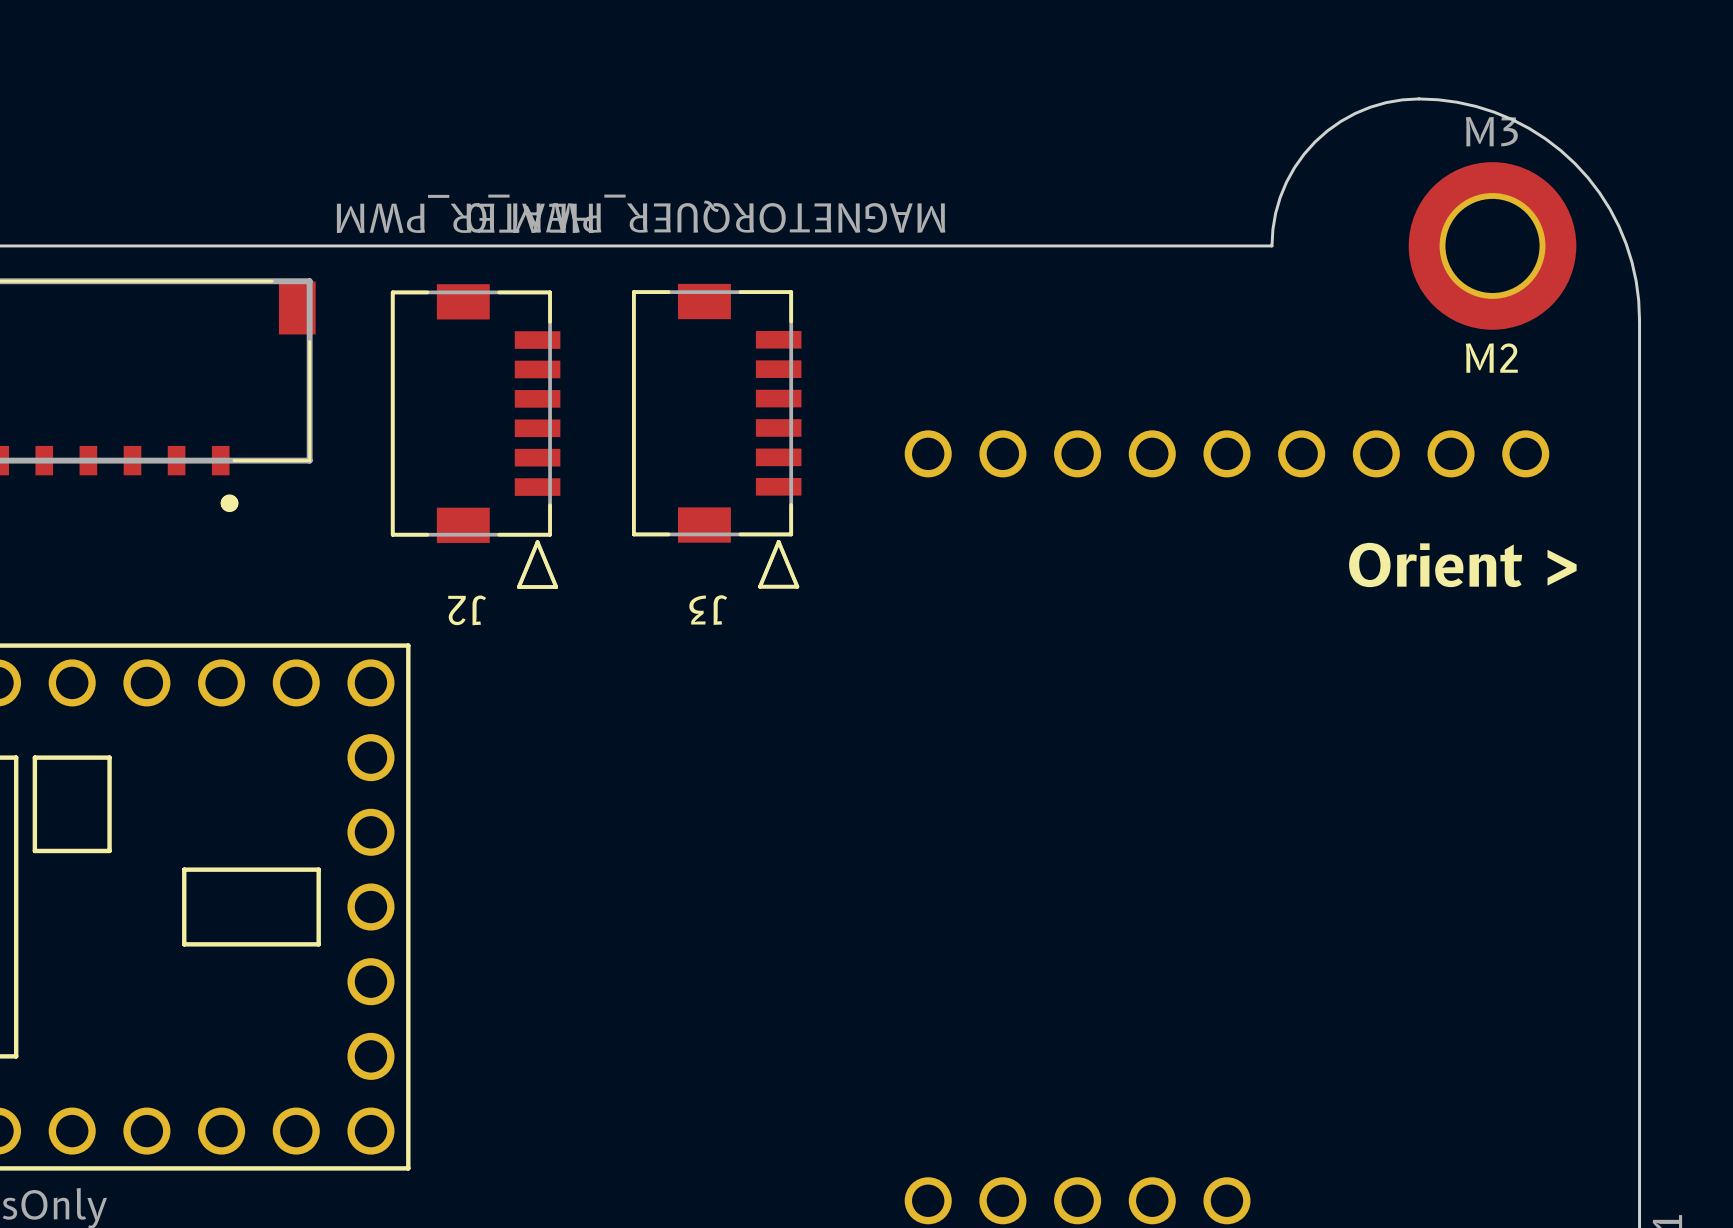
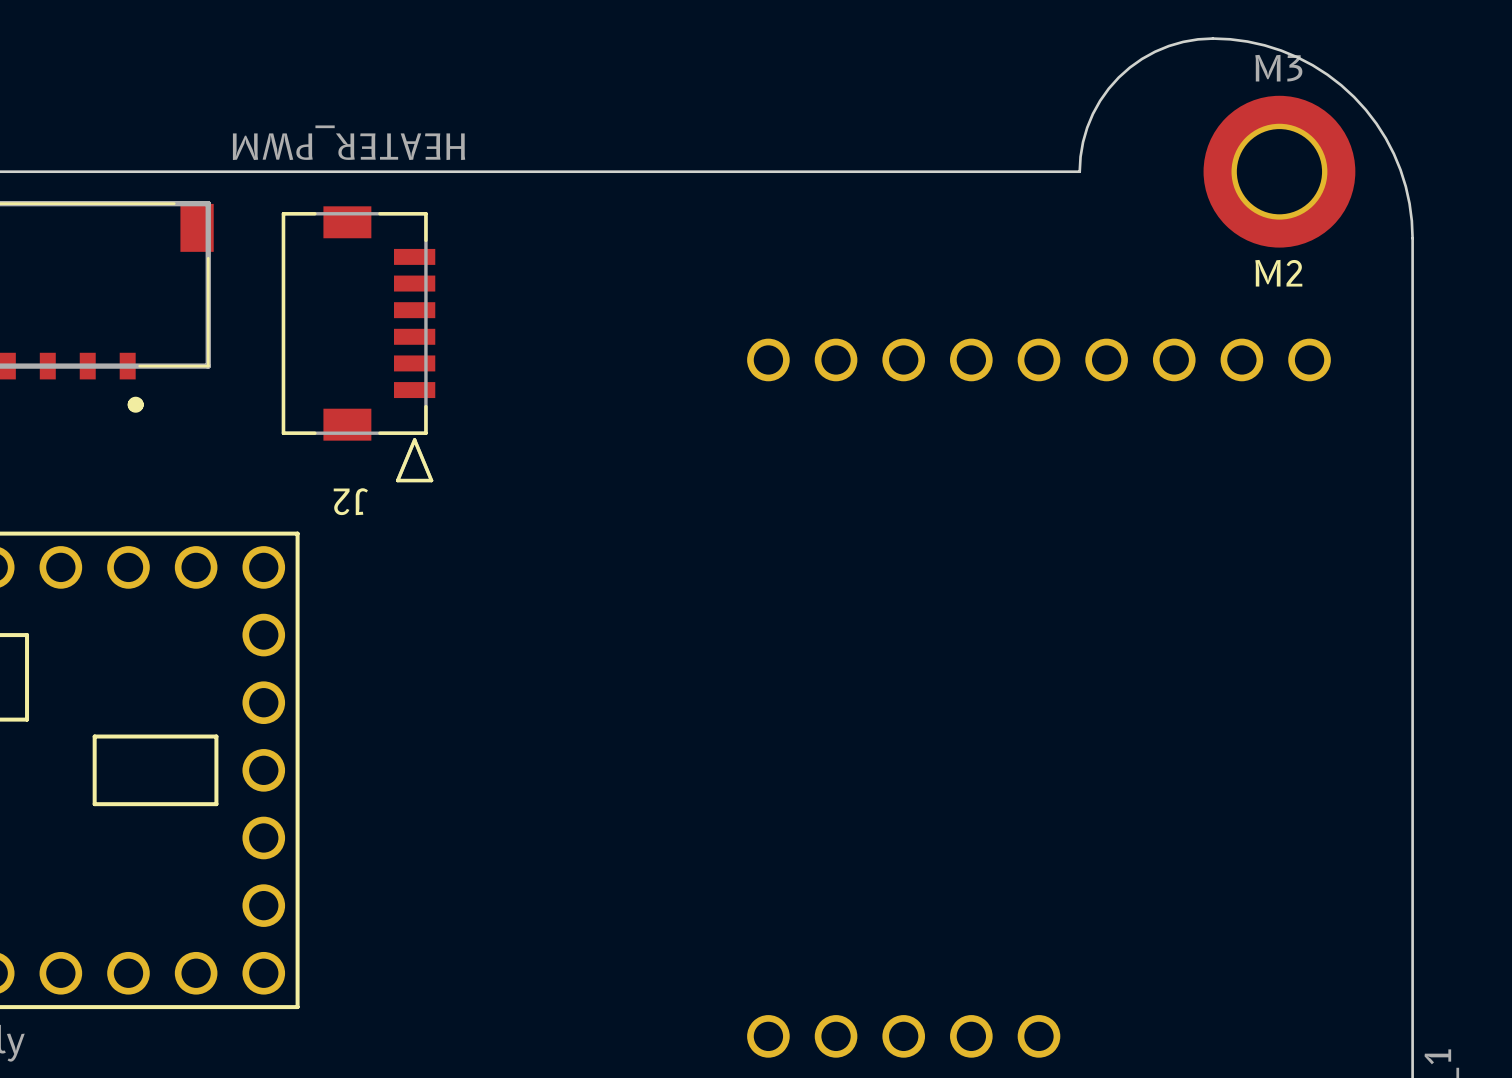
J3: MAGNETORQUER_PWM_0 (716, 436) -> none
text: Orient > (1462, 565) -> none

